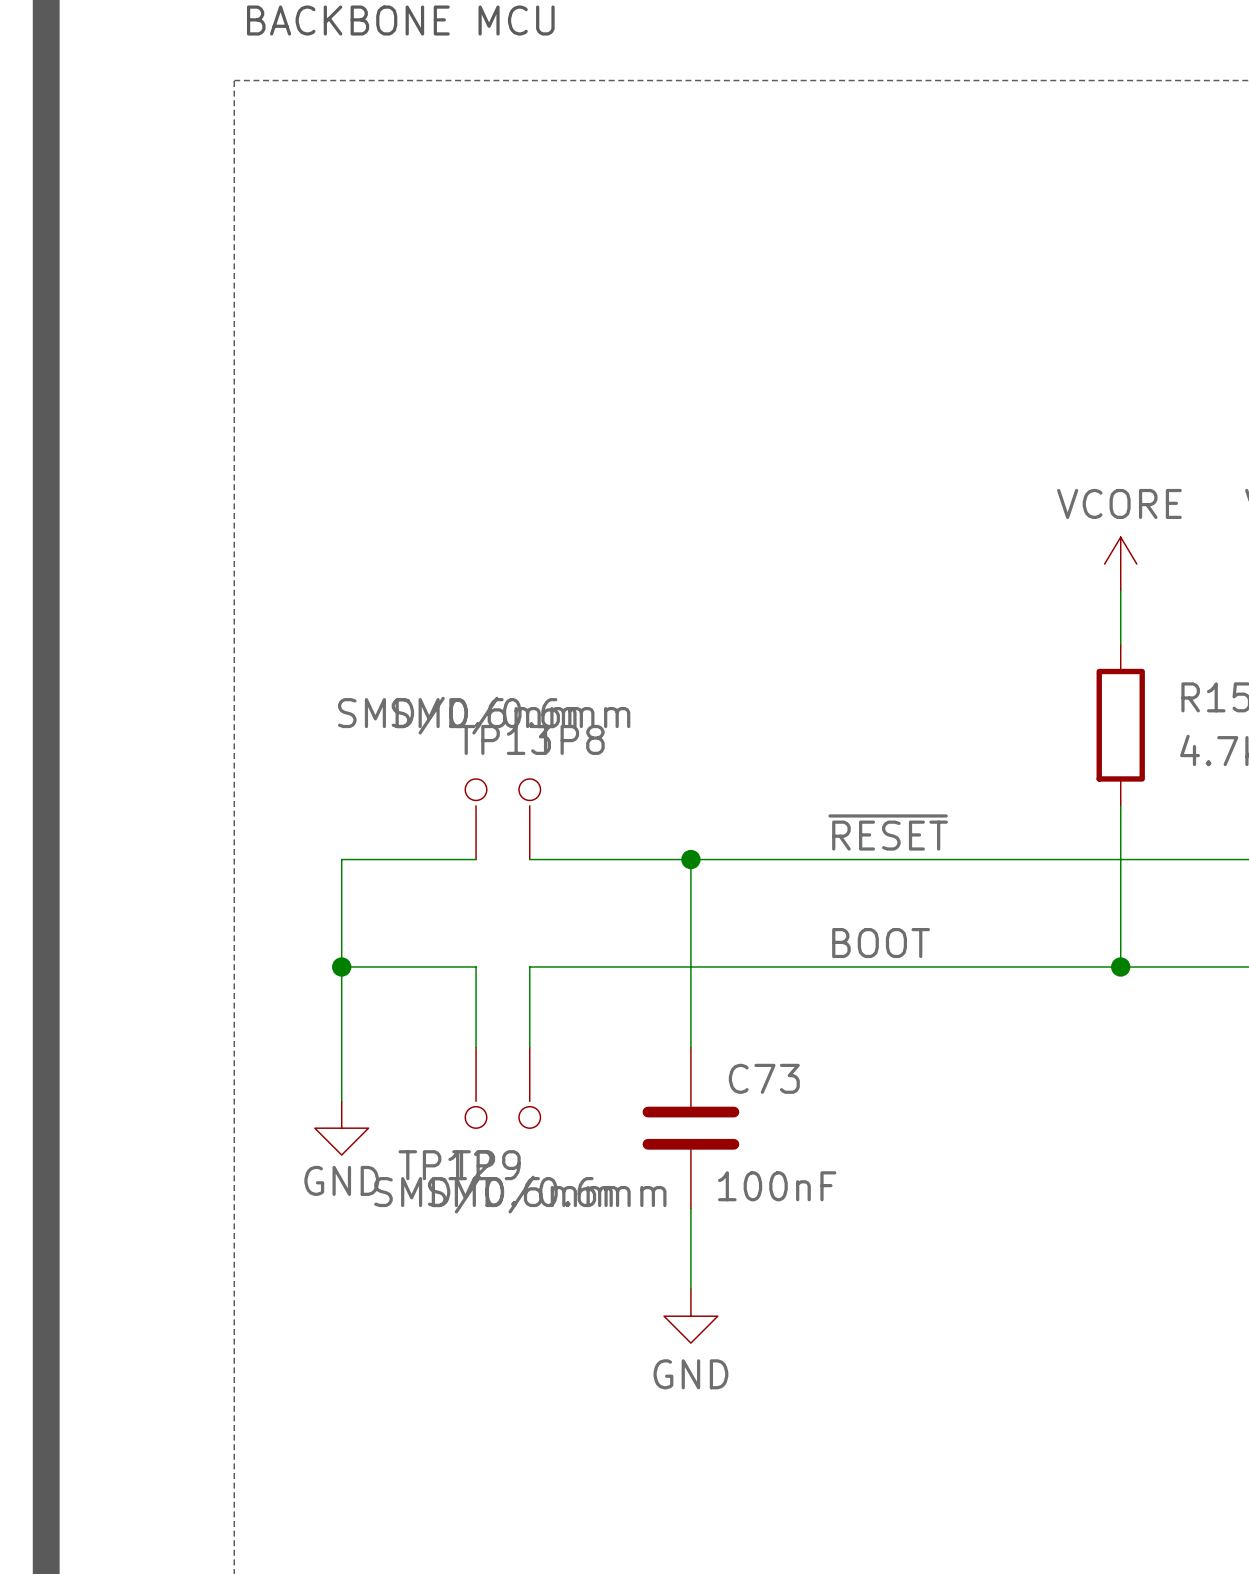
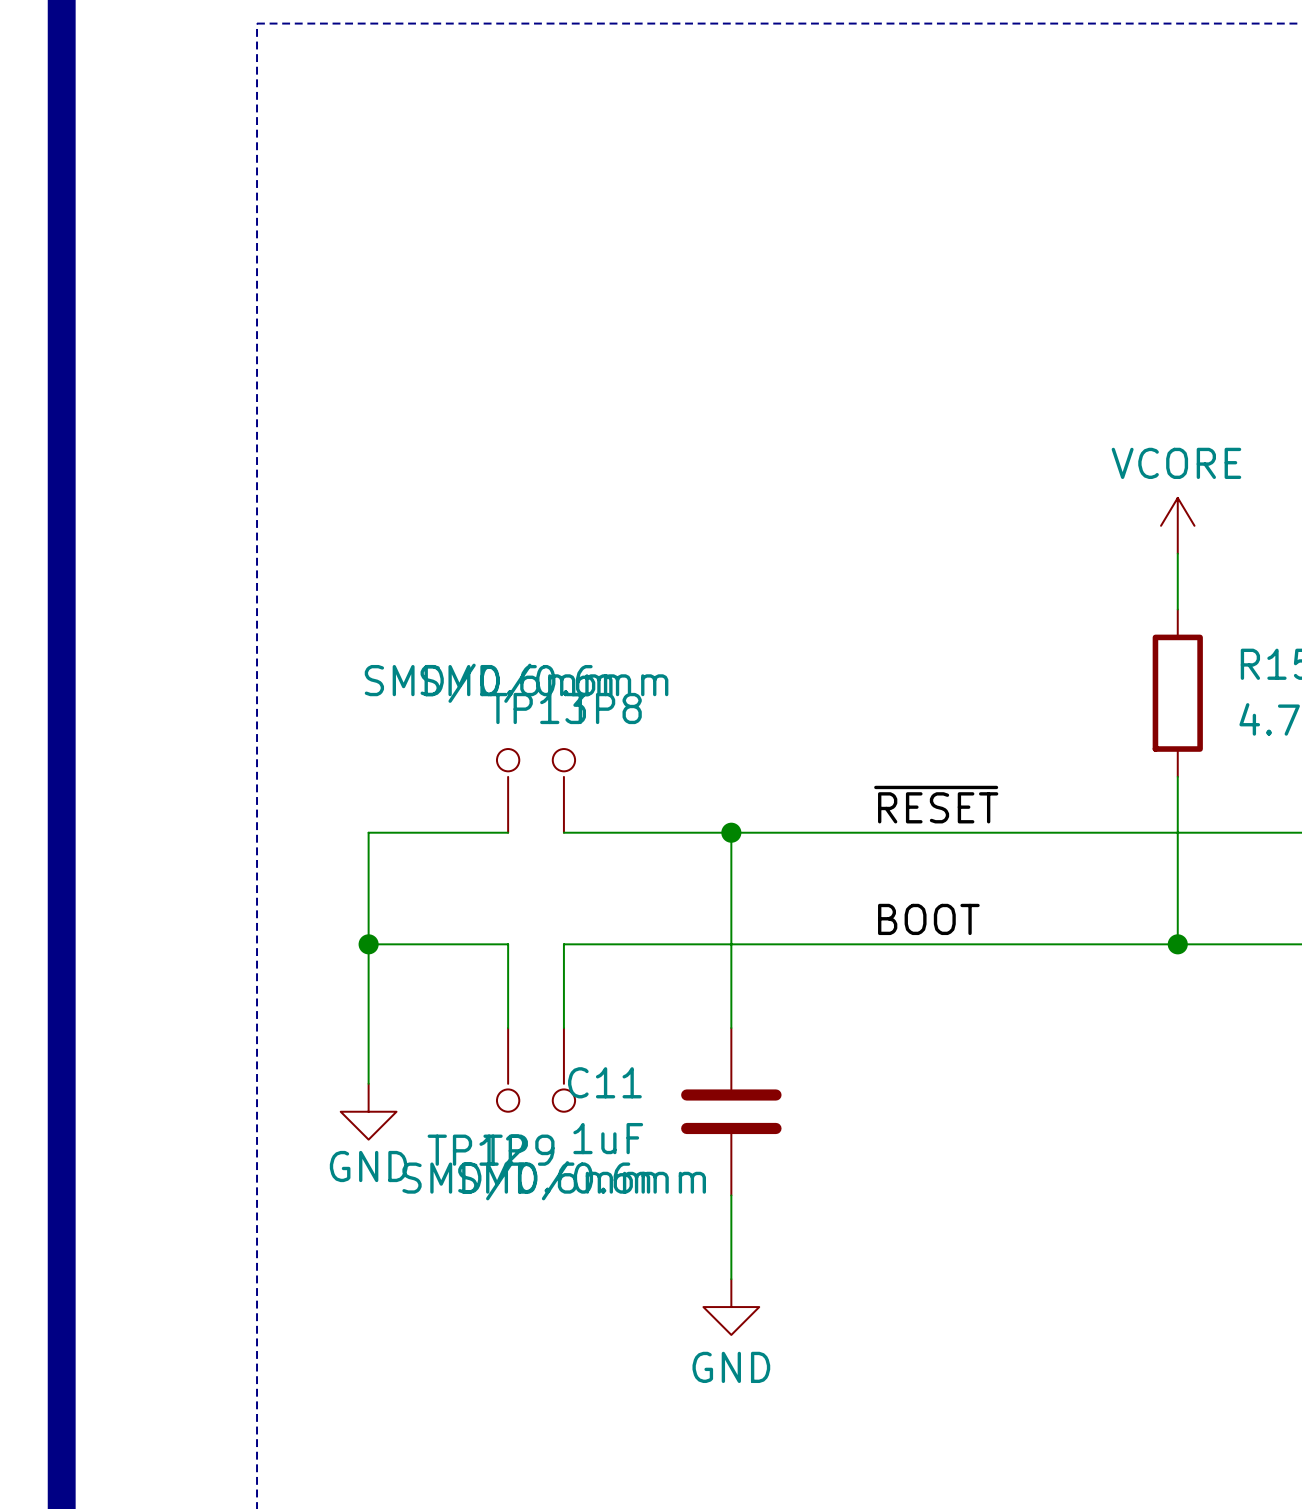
C73 name: C73 (764, 1078) -> C11 (604, 1082)
C73 value: 100nF (777, 1186) -> 1uF (608, 1138)

